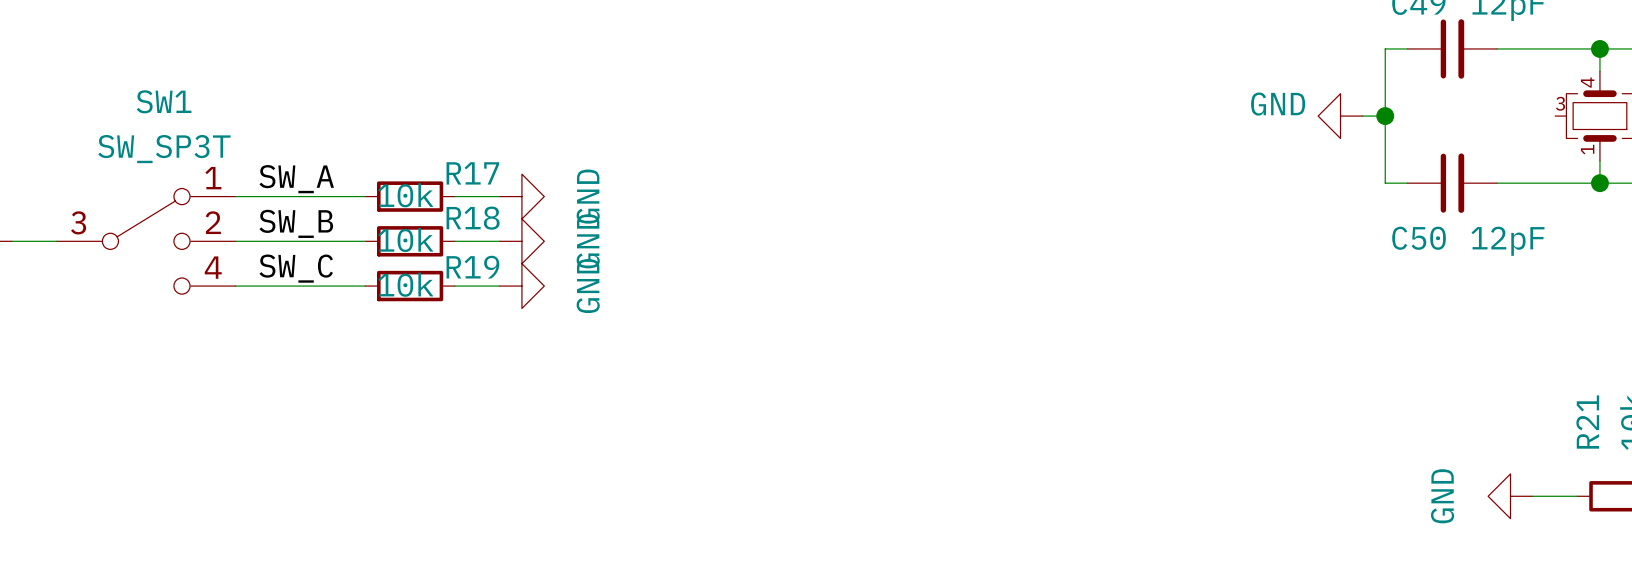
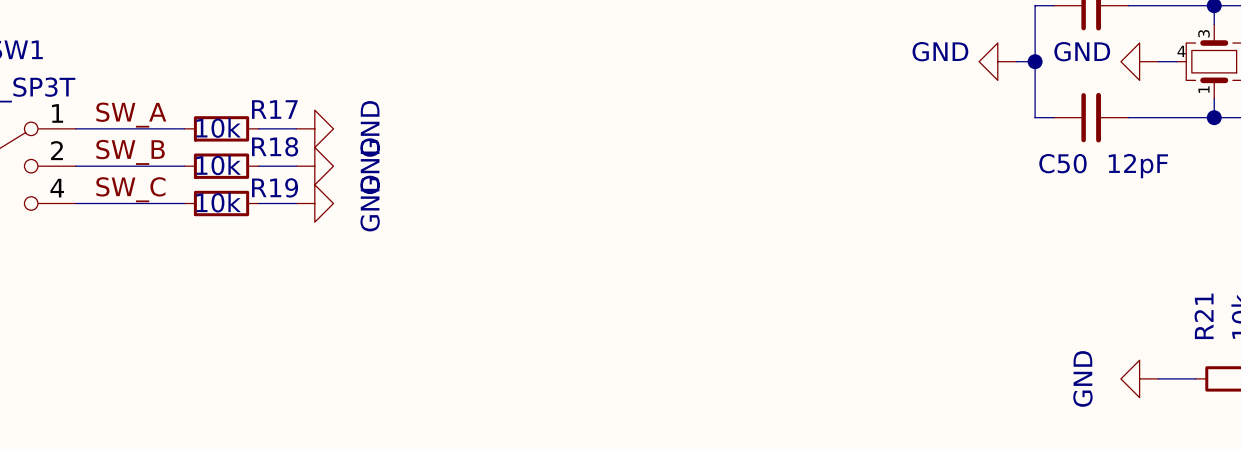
part pin number: 4 (1587, 82) -> 3 (1203, 33)
part pin number: 3 (1560, 103) -> 4 (1181, 51)
power symbol: none -> GND (1139, 61)
wire: none -> (1158, 61) (1176, 61)

